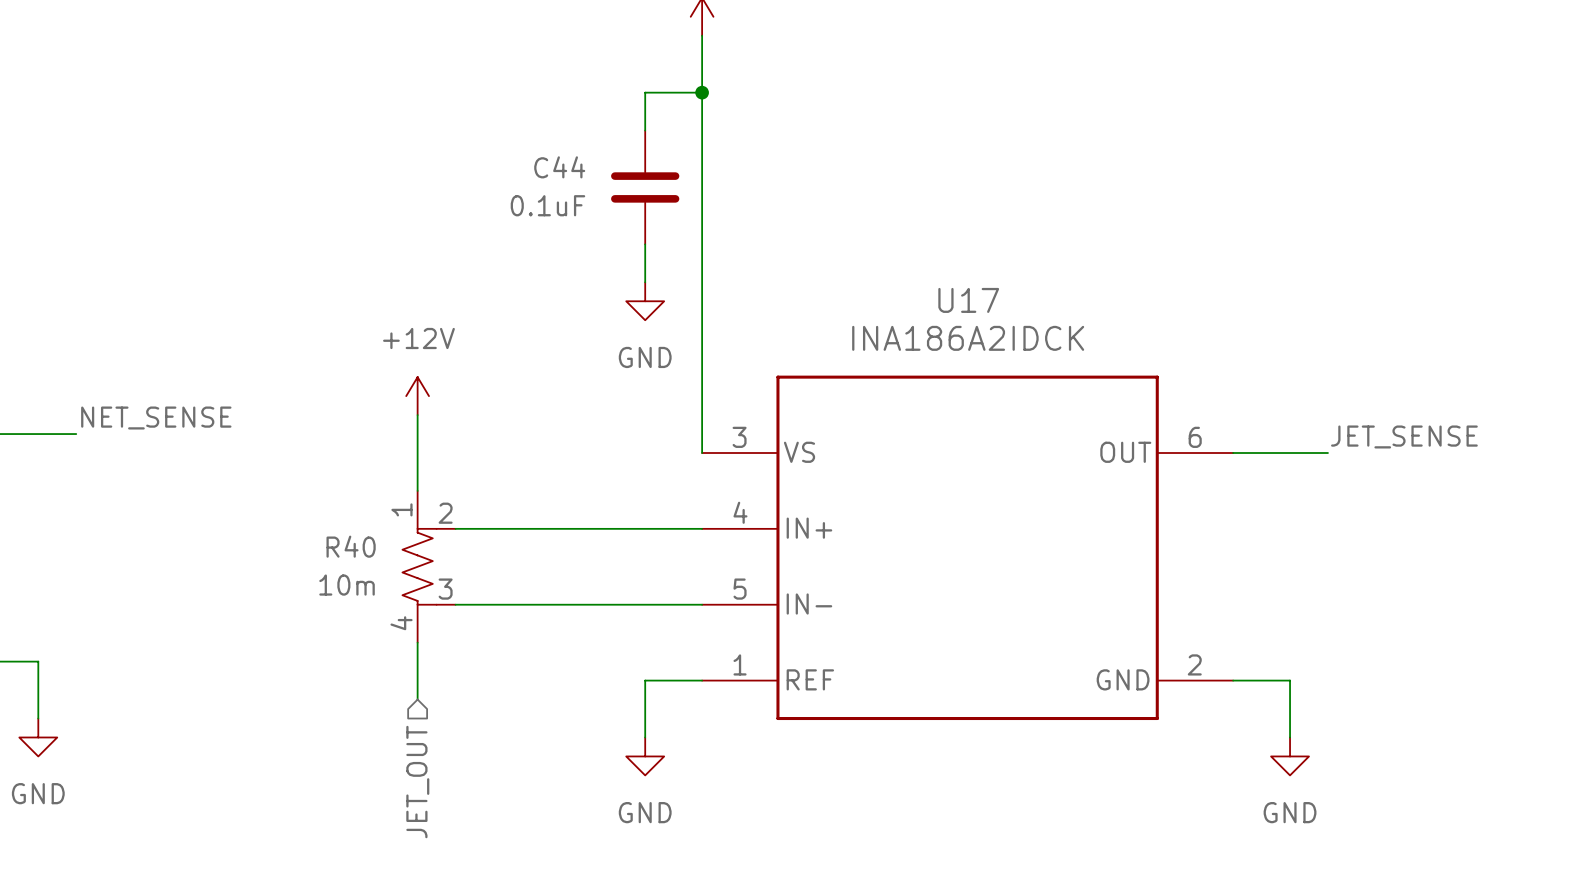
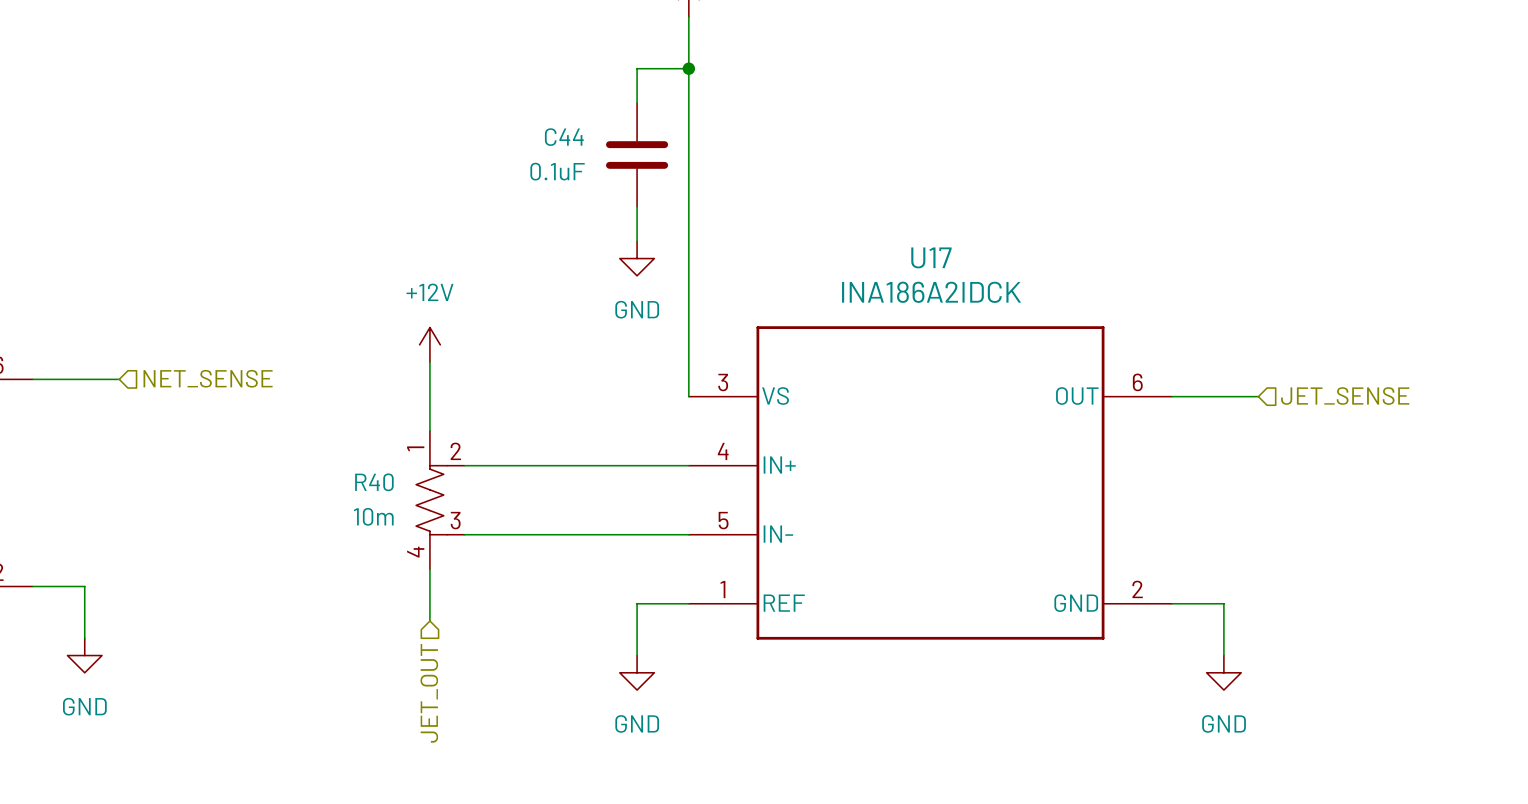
label: NET_SENSE (156, 418) -> none
hierarchical label: none -> NET_SENSE (208, 378)
label: JET_SENSE (1404, 436) -> none
hierarchical label: none -> JET_SENSE (1345, 396)

